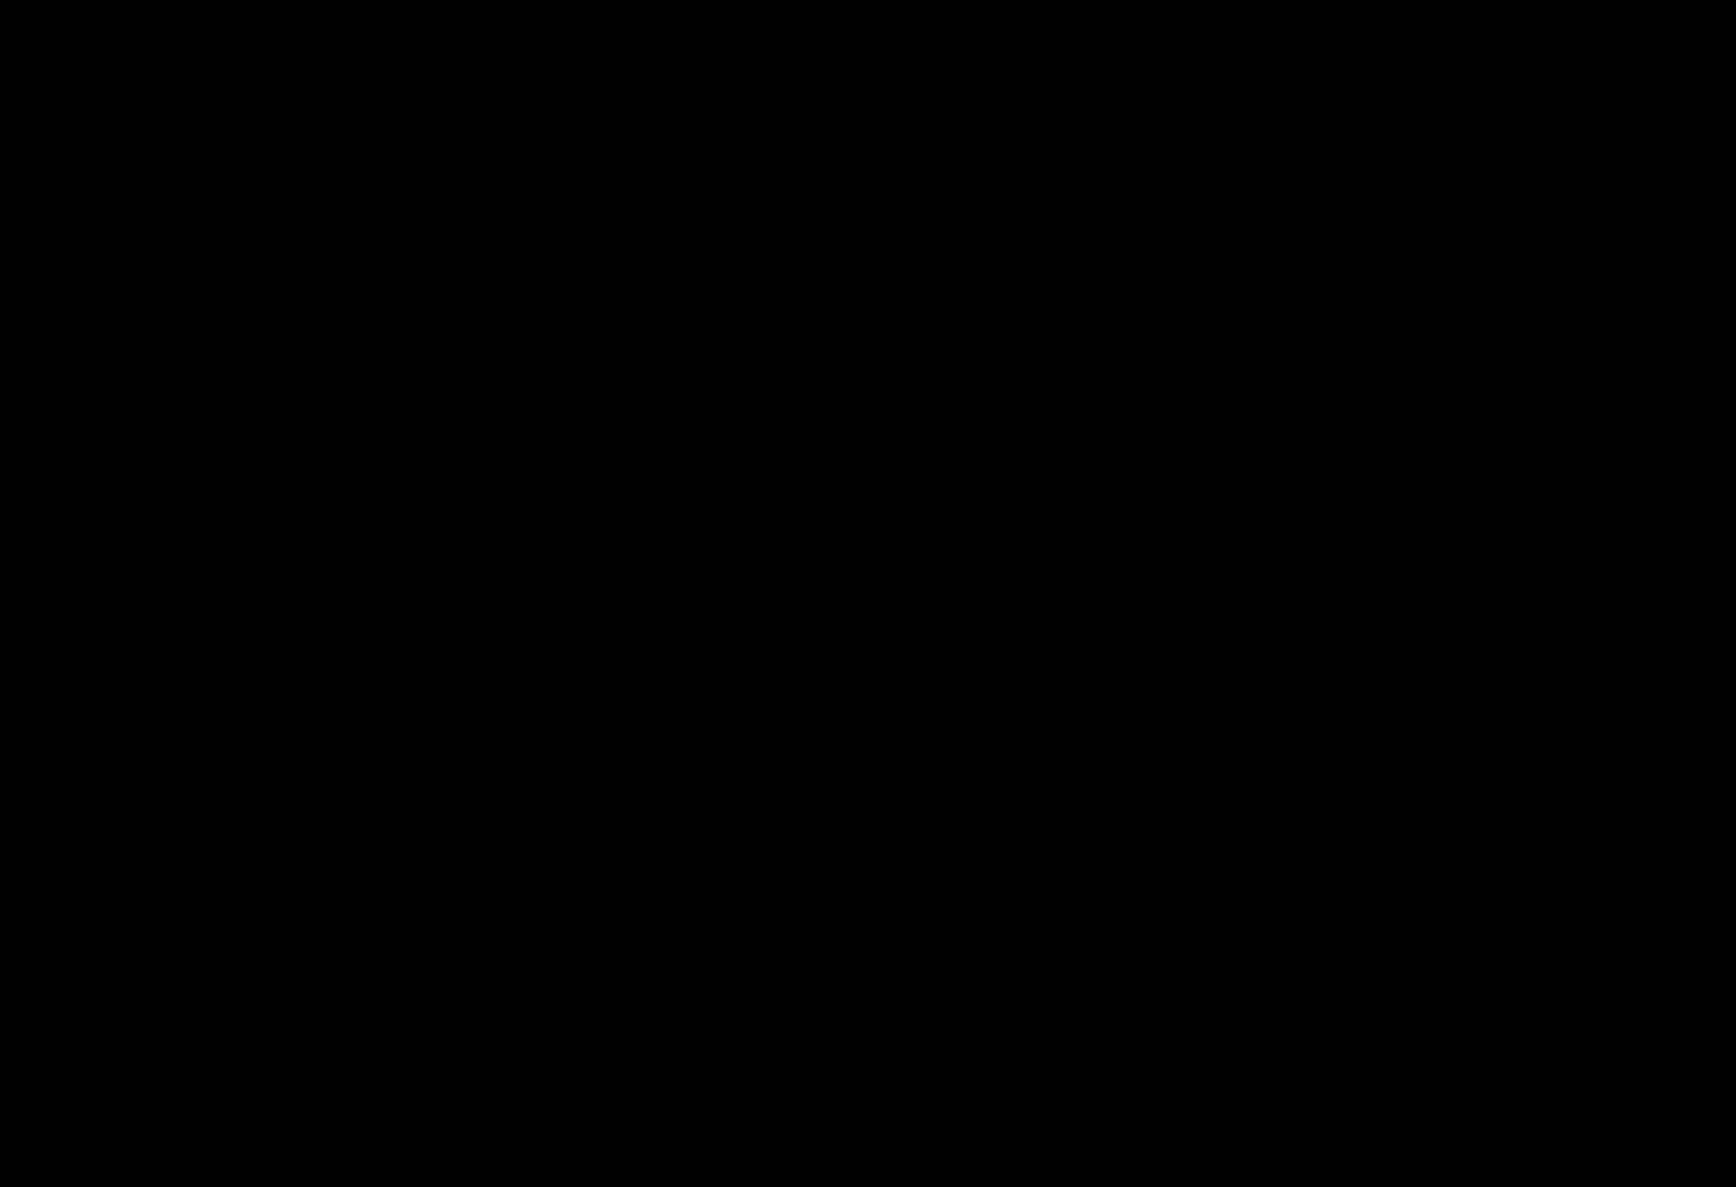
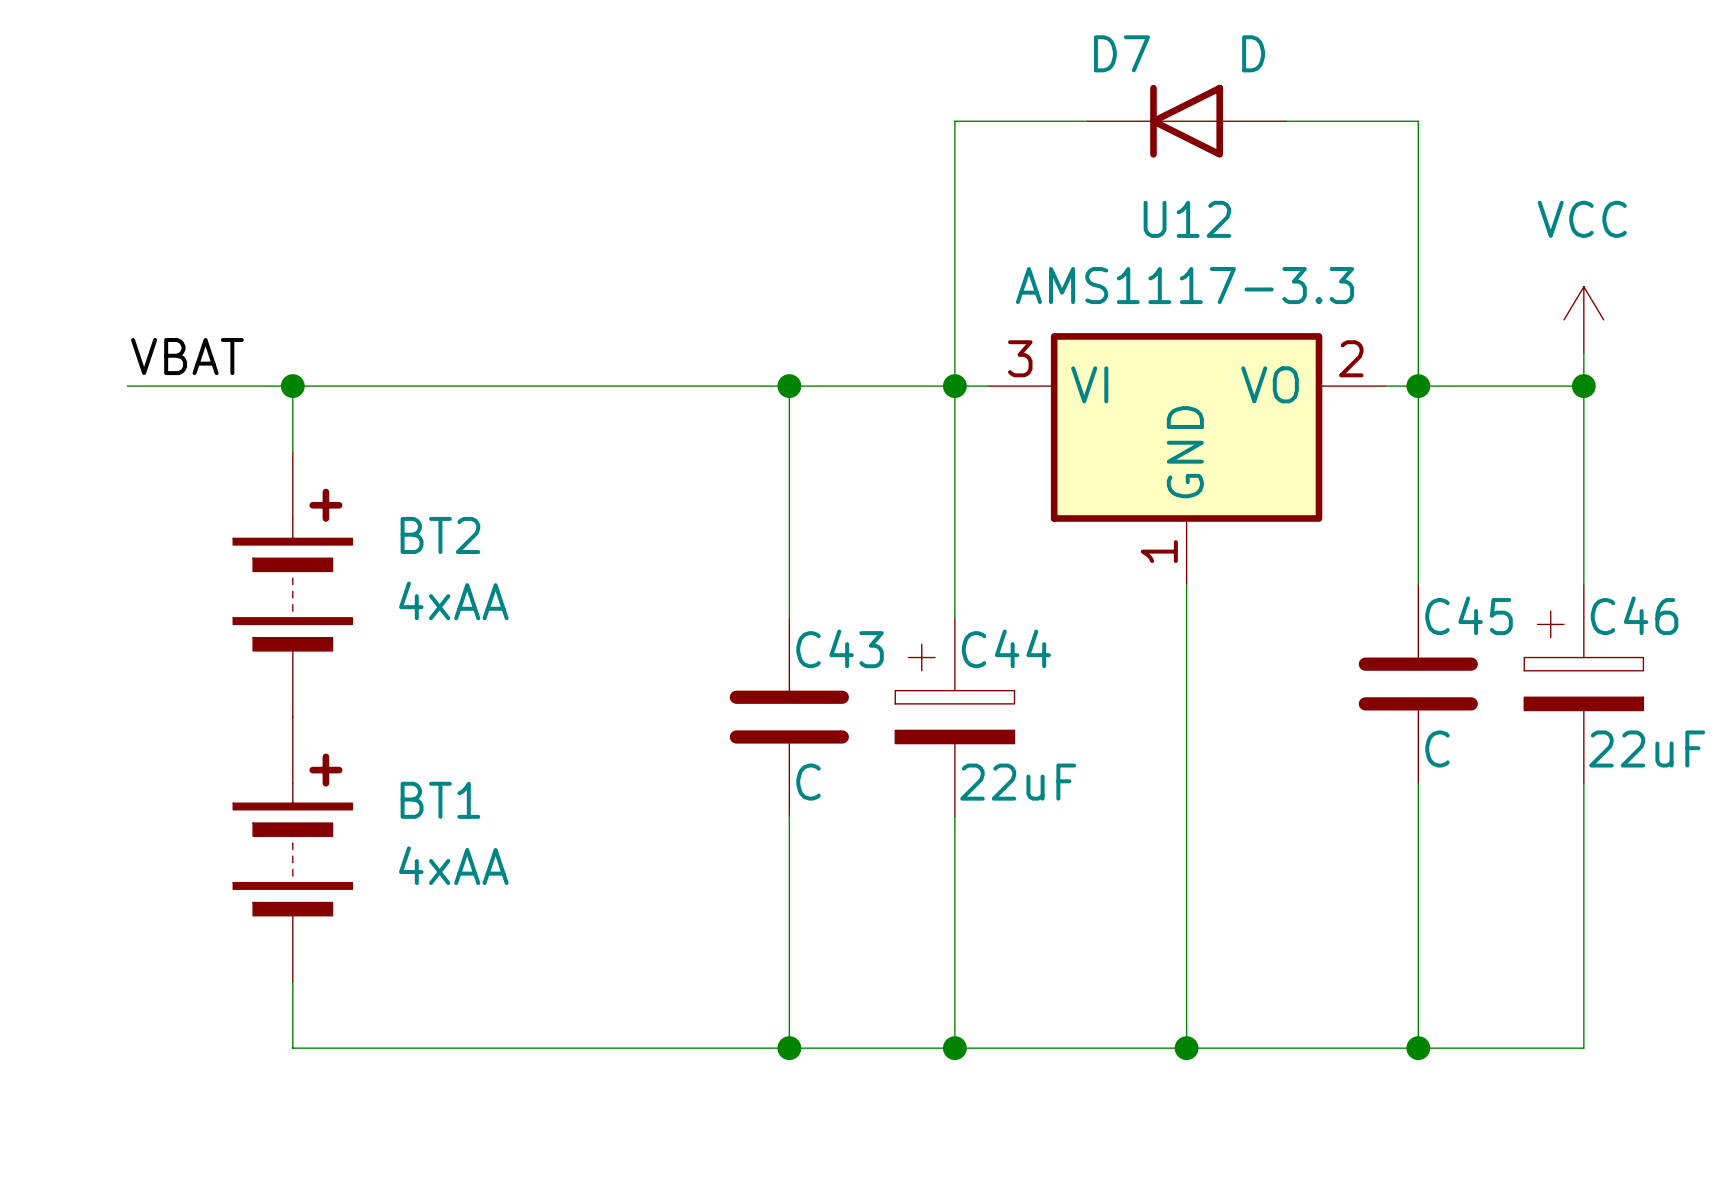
wire: none -> (1087, 121) (954, 121) (954, 617)
D7: none -> D (1186, 121)
wire: none -> (1285, 121) (1418, 121) (1418, 584)
power symbol: none -> VCC (1583, 319)
wire: none -> (1583, 352) (1583, 584)
label: none -> VBAT (187, 356)
wire: none -> (127, 386) (987, 386)
wire: none -> (292, 386) (292, 452)
junction: none -> (292, 386)
wire: none -> (789, 386) (789, 617)
junction: none -> (789, 386)
junction: none -> (954, 386)
wire: none -> (1385, 386) (1583, 386)
junction: none -> (1418, 386)
junction: none -> (1583, 386)
U12: none -> AMS1117-3.3 (1186, 458)
BT2: none -> 4xAA (292, 584)
wire: none -> (1186, 584) (1186, 1048)
C45: none -> C (1418, 684)
C46: none -> 22uF (1583, 684)
C43: none -> C (789, 717)
C44: none -> 22uF (954, 717)
wire: none -> (1418, 783) (1418, 1048)
wire: none -> (1583, 783) (1583, 1048) (292, 1048) (292, 981)
wire: none -> (789, 816) (789, 1048)
wire: none -> (954, 816) (954, 1048)
BT1: none -> 4xAA (292, 849)
junction: none -> (789, 1048)
junction: none -> (954, 1048)
junction: none -> (1186, 1048)
junction: none -> (1418, 1048)

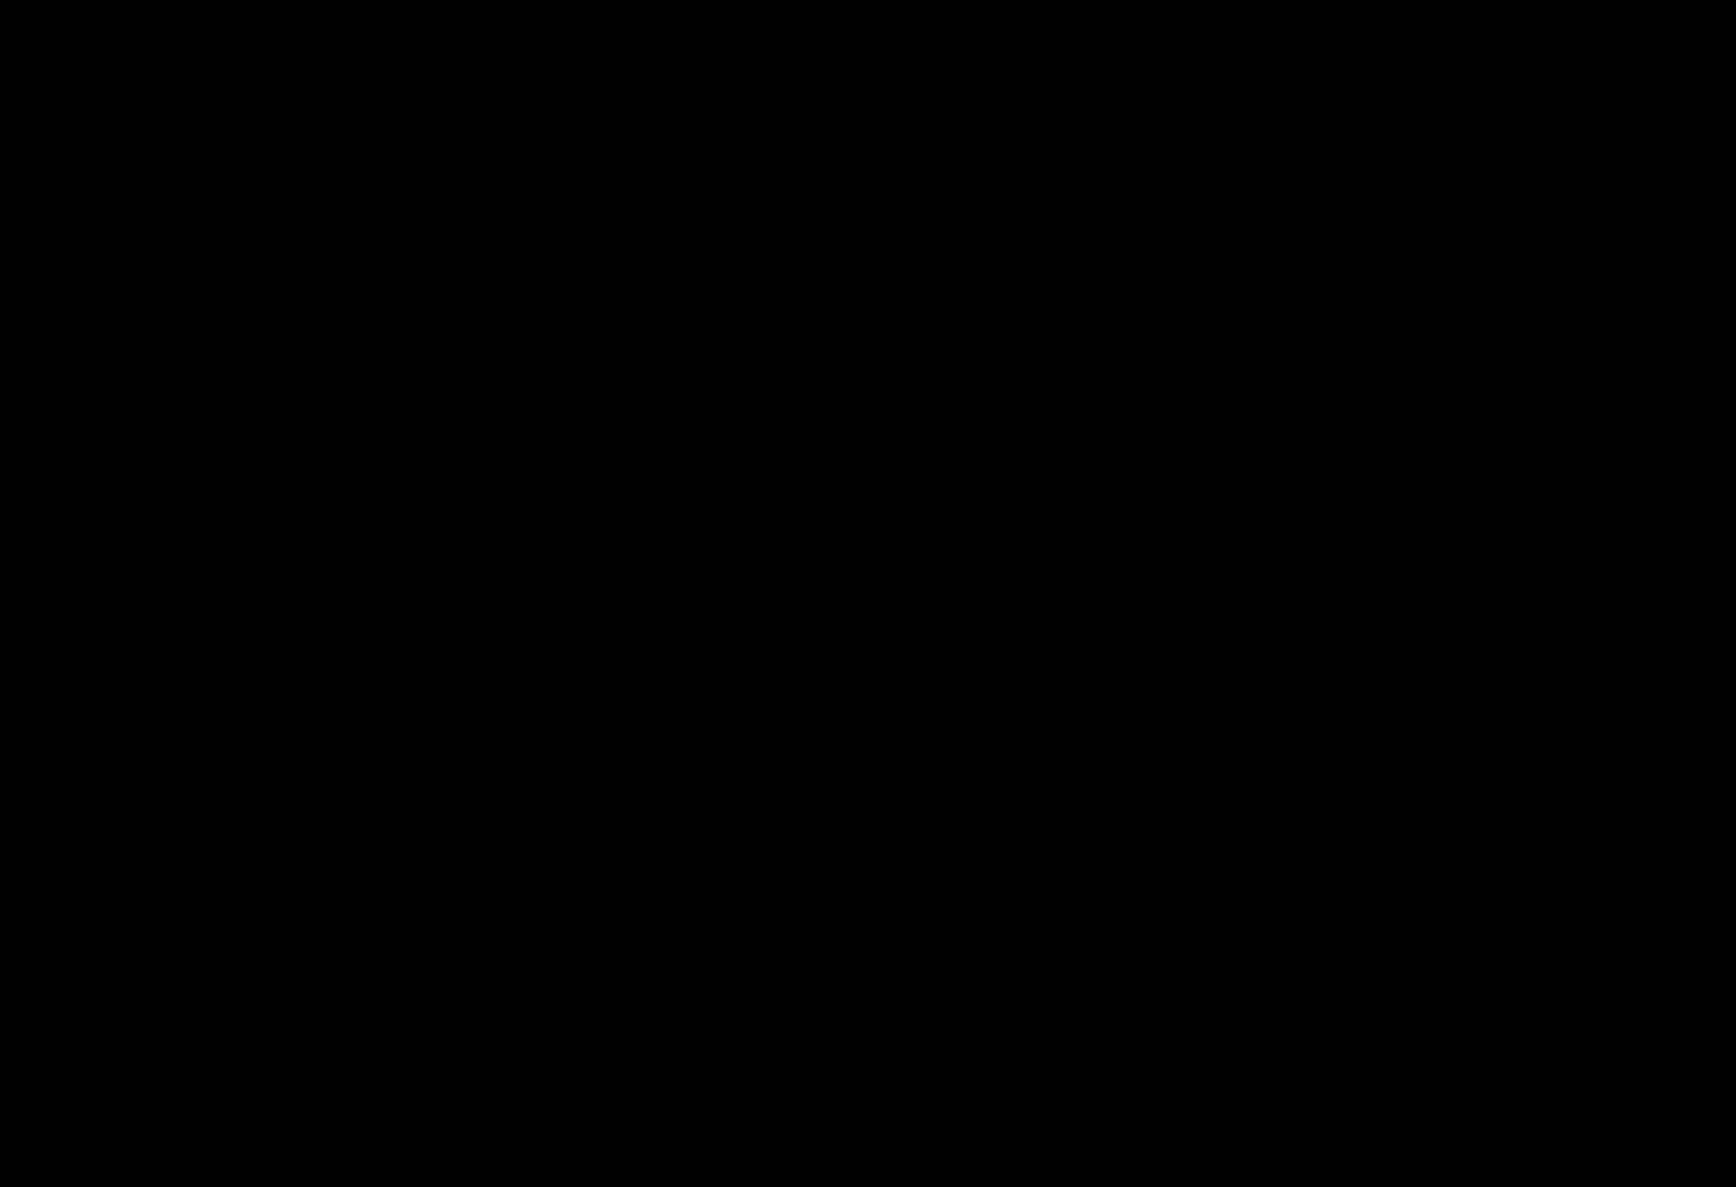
wire: (1087, 121) (954, 121) (954, 617) -> none
D7: D (1186, 121) -> none
wire: (1285, 121) (1418, 121) (1418, 584) -> none
power symbol: VCC (1583, 319) -> none
wire: (1583, 352) (1583, 584) -> none
label: VBAT (187, 356) -> none
wire: (127, 386) (987, 386) -> none
wire: (292, 386) (292, 452) -> none
junction: (292, 386) -> none
wire: (789, 386) (789, 617) -> none
junction: (789, 386) -> none
junction: (954, 386) -> none
wire: (1385, 386) (1583, 386) -> none
junction: (1418, 386) -> none
junction: (1583, 386) -> none
U12: AMS1117-3.3 (1186, 458) -> none
BT2: 4xAA (292, 584) -> none
wire: (1186, 584) (1186, 1048) -> none
C45: C (1418, 684) -> none
C46: 22uF (1583, 684) -> none
C43: C (789, 717) -> none
C44: 22uF (954, 717) -> none
wire: (1418, 783) (1418, 1048) -> none
wire: (1583, 783) (1583, 1048) (292, 1048) (292, 981) -> none
wire: (789, 816) (789, 1048) -> none
wire: (954, 816) (954, 1048) -> none
BT1: 4xAA (292, 849) -> none
junction: (789, 1048) -> none
junction: (954, 1048) -> none
junction: (1186, 1048) -> none
junction: (1418, 1048) -> none

